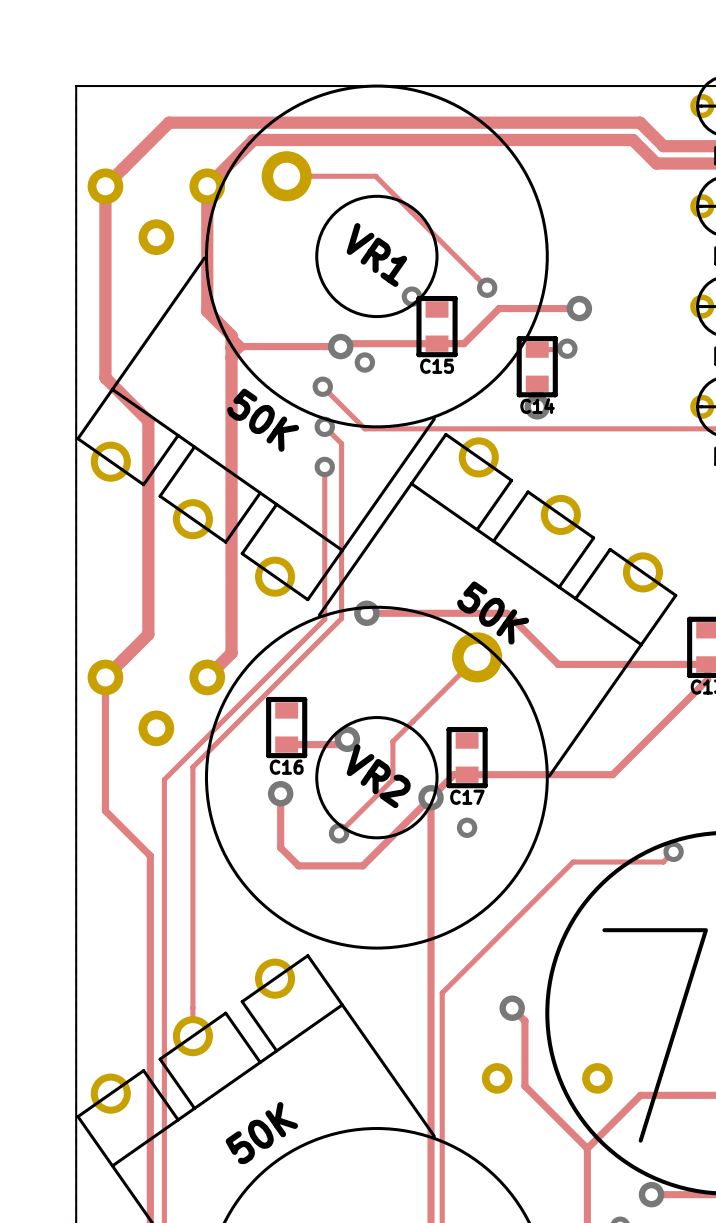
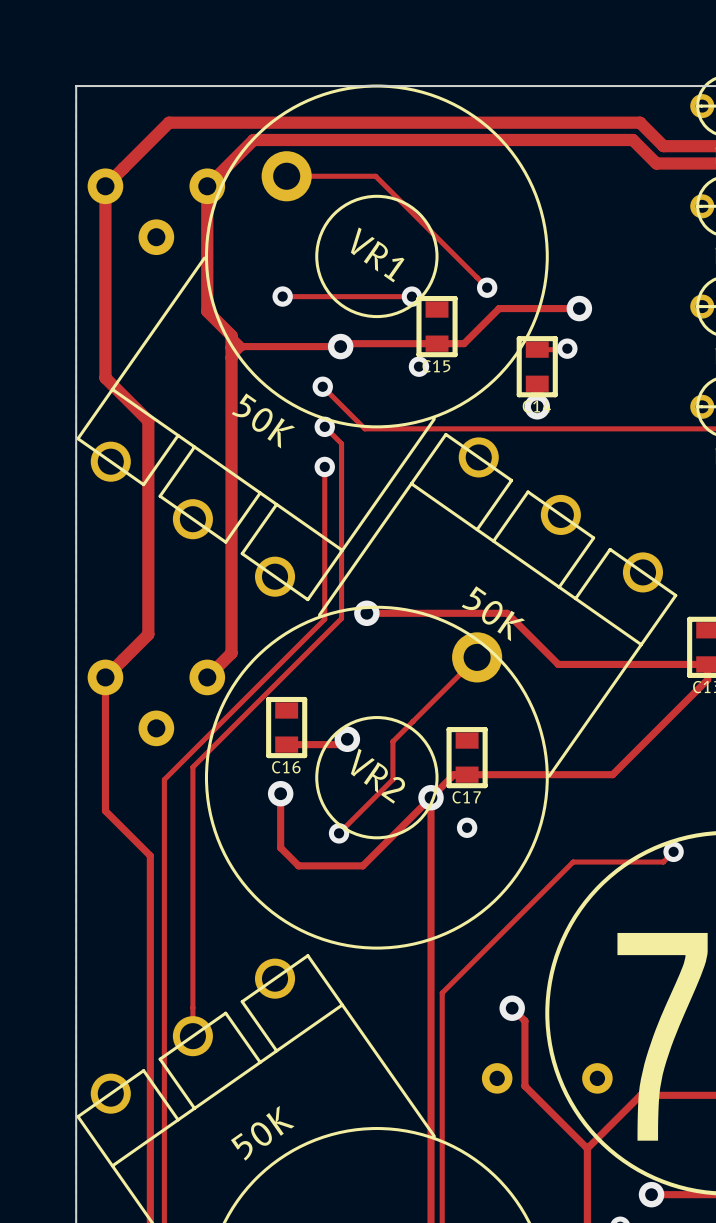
track: none -> (282, 296) (411, 296)
via: none -> (282, 296)
via: (364, 362) -> none
via: none -> (418, 366)

